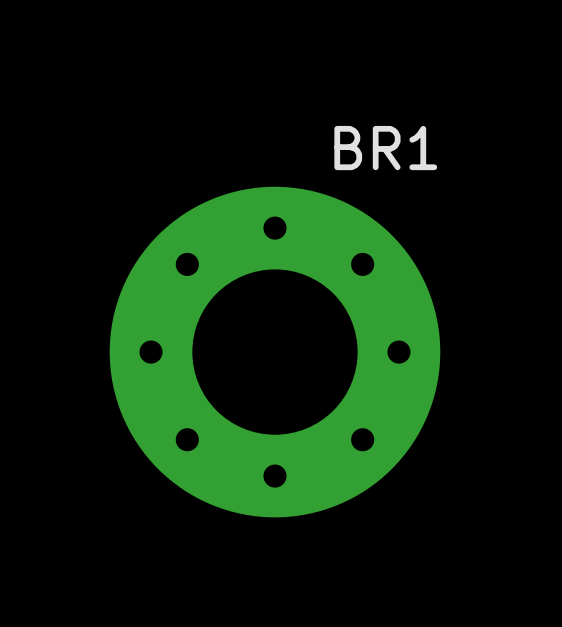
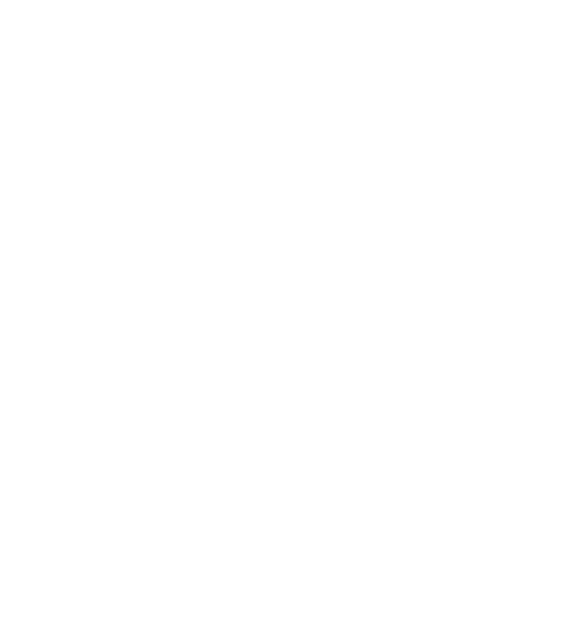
BR1: (274, 352) -> none

